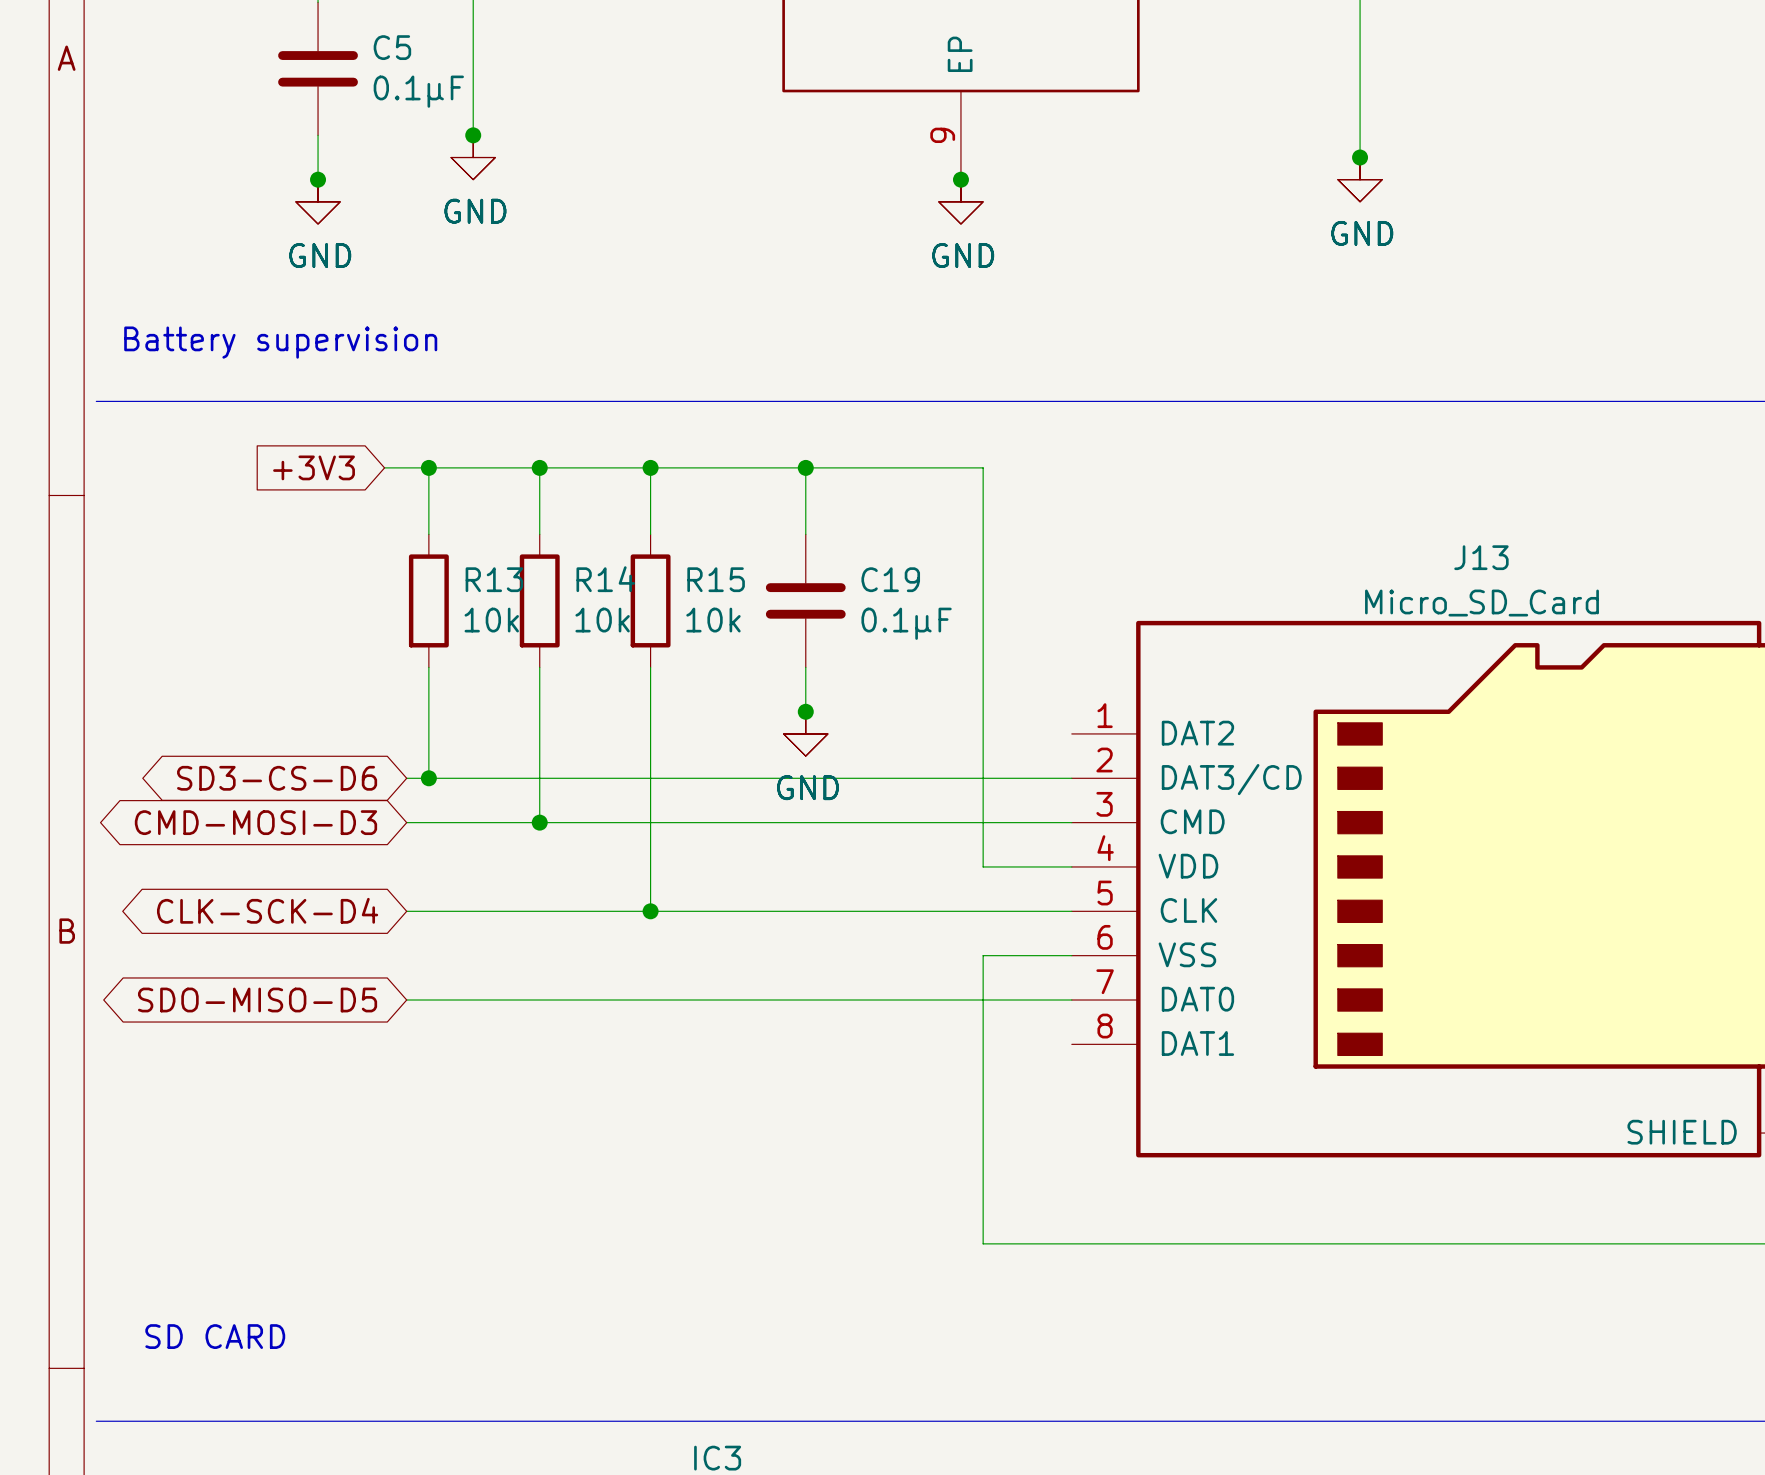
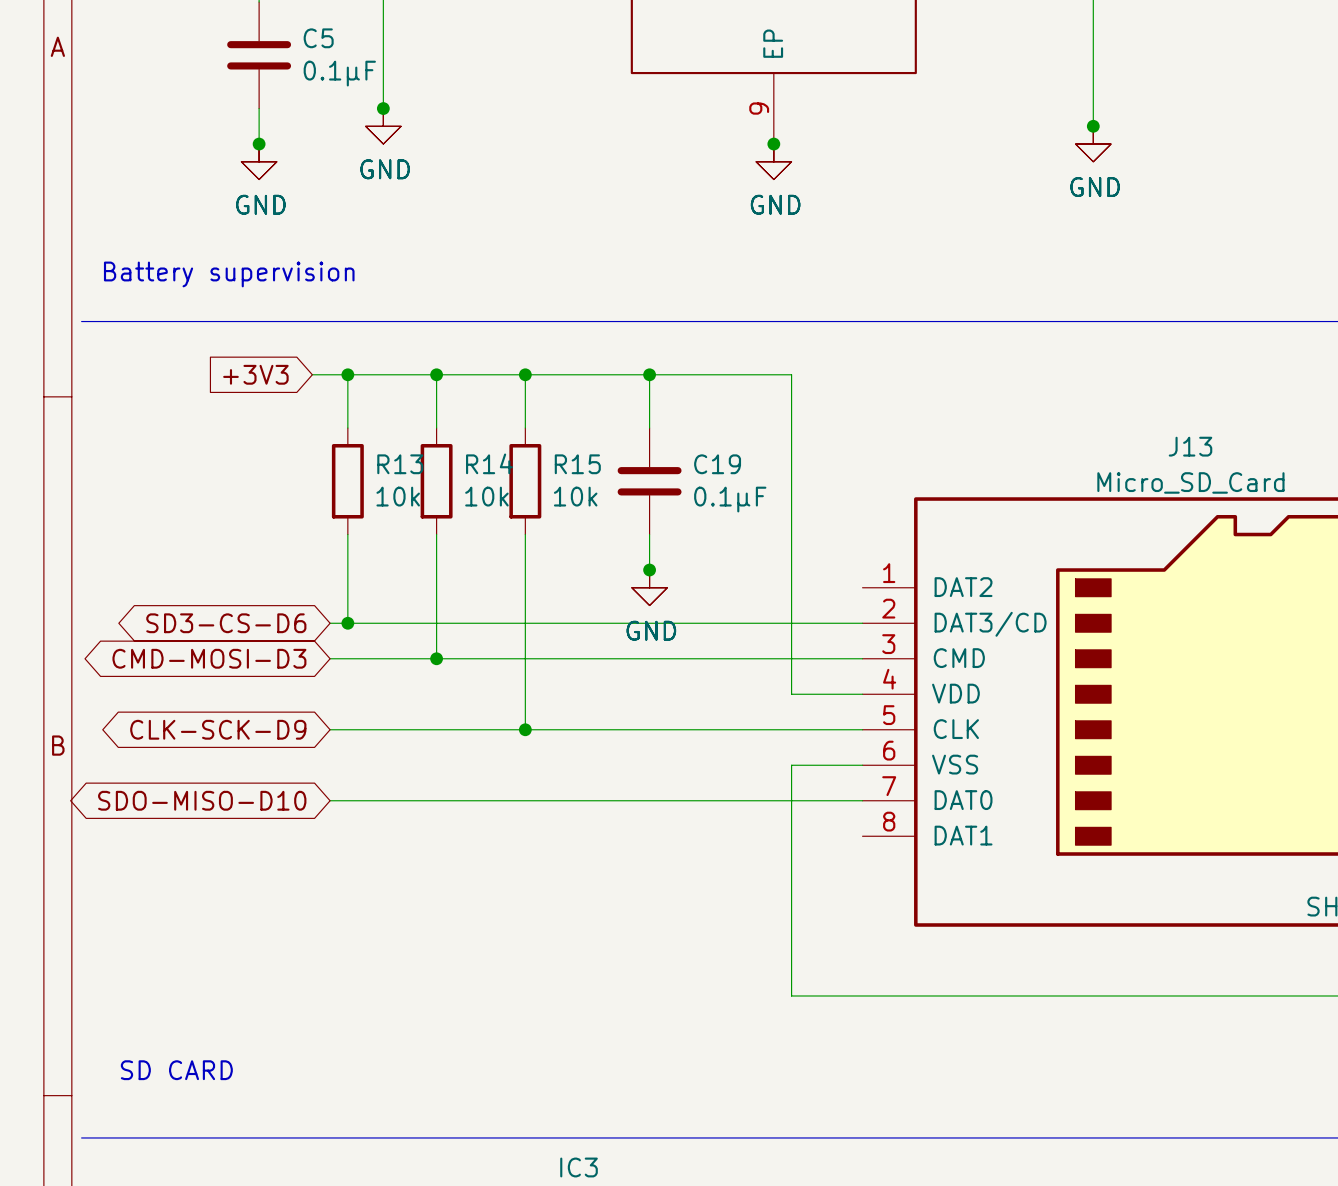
global label: CLK-SCK-D4 (267, 910) -> CLK-SCK-D9 (218, 729)
global label: SDO-MISO-D5 (257, 1000) -> SDO-MISO-D10 (202, 800)

